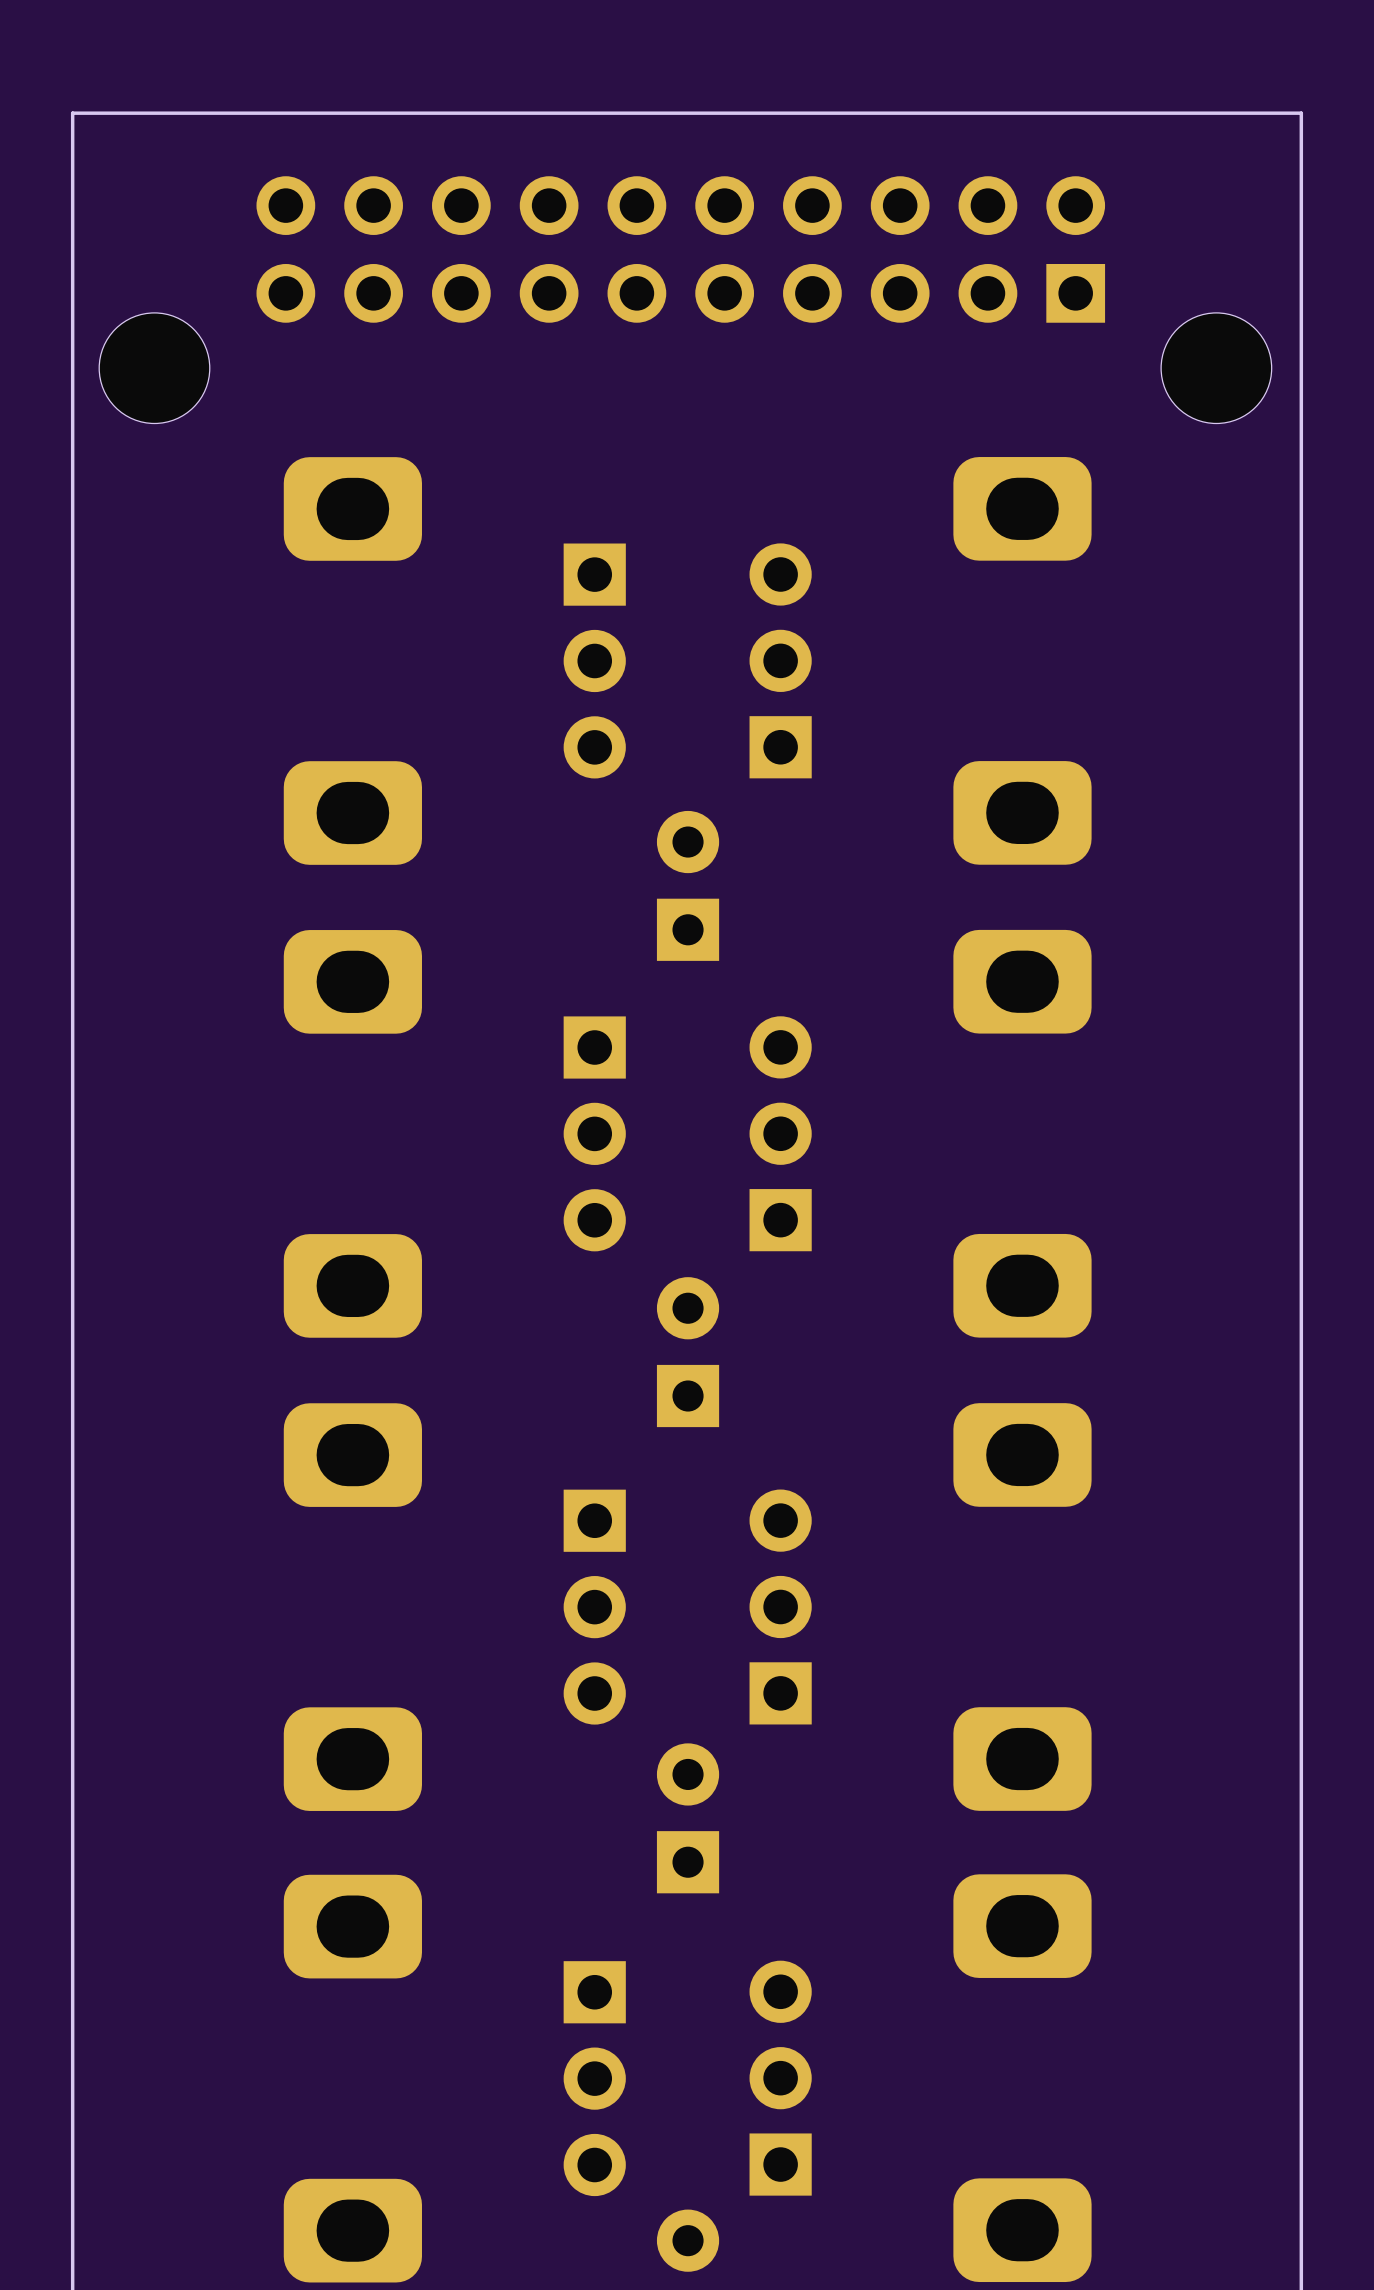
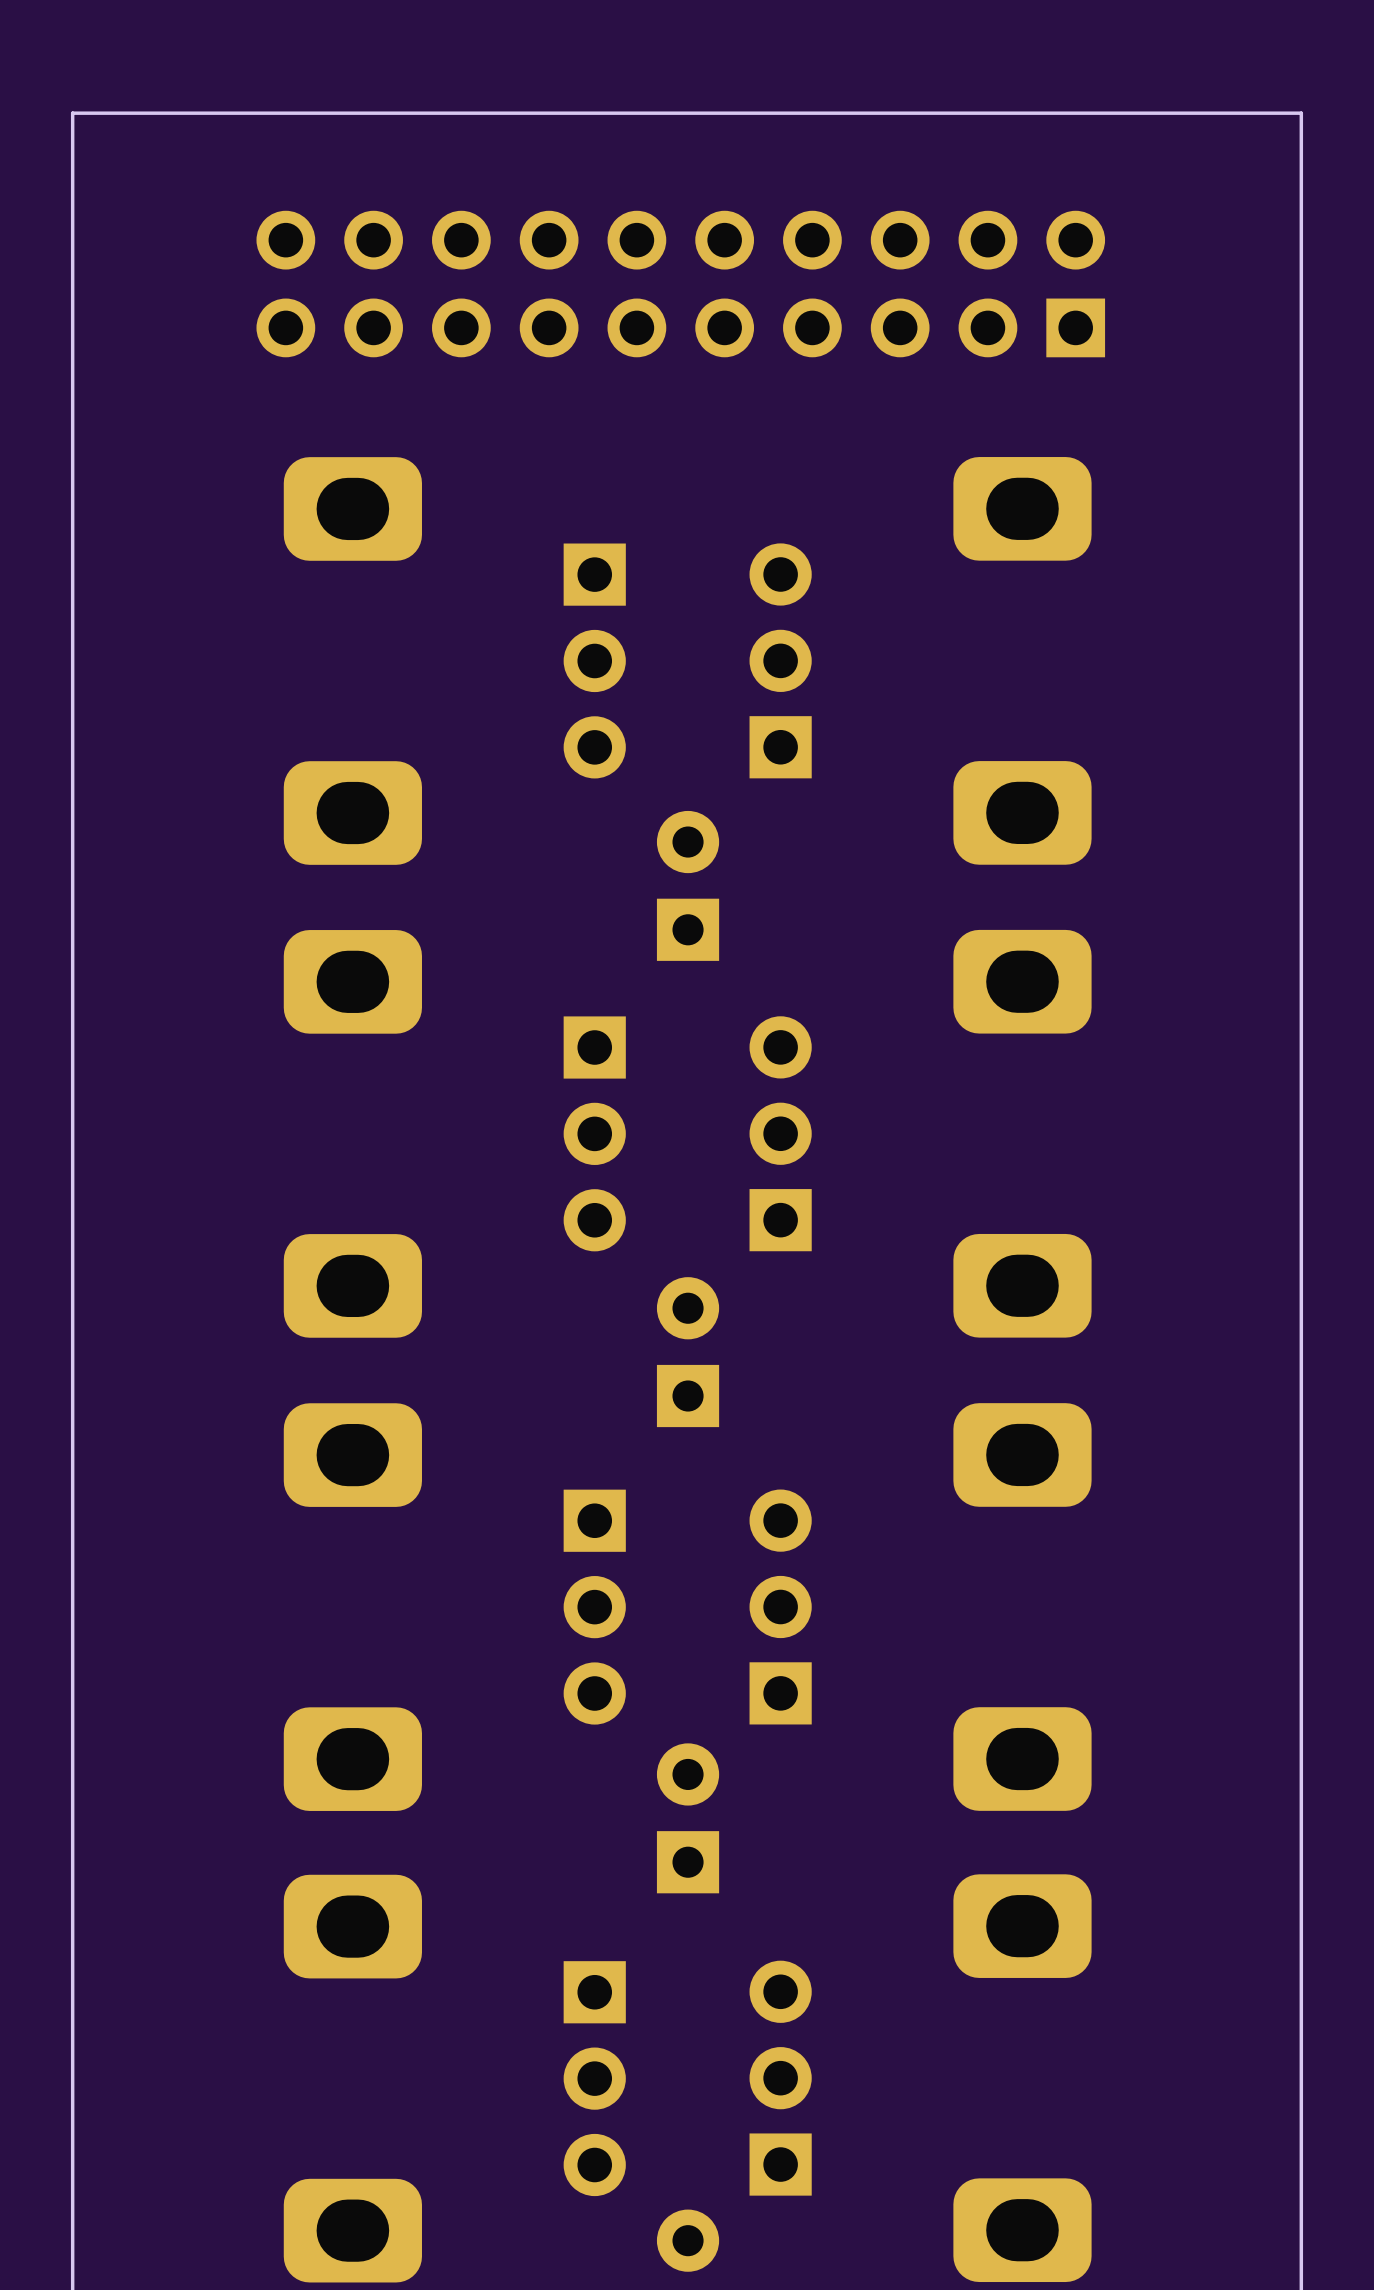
part position: (680, 249) -> (680, 284)
part: (154, 368) -> none
part: (1216, 368) -> none

